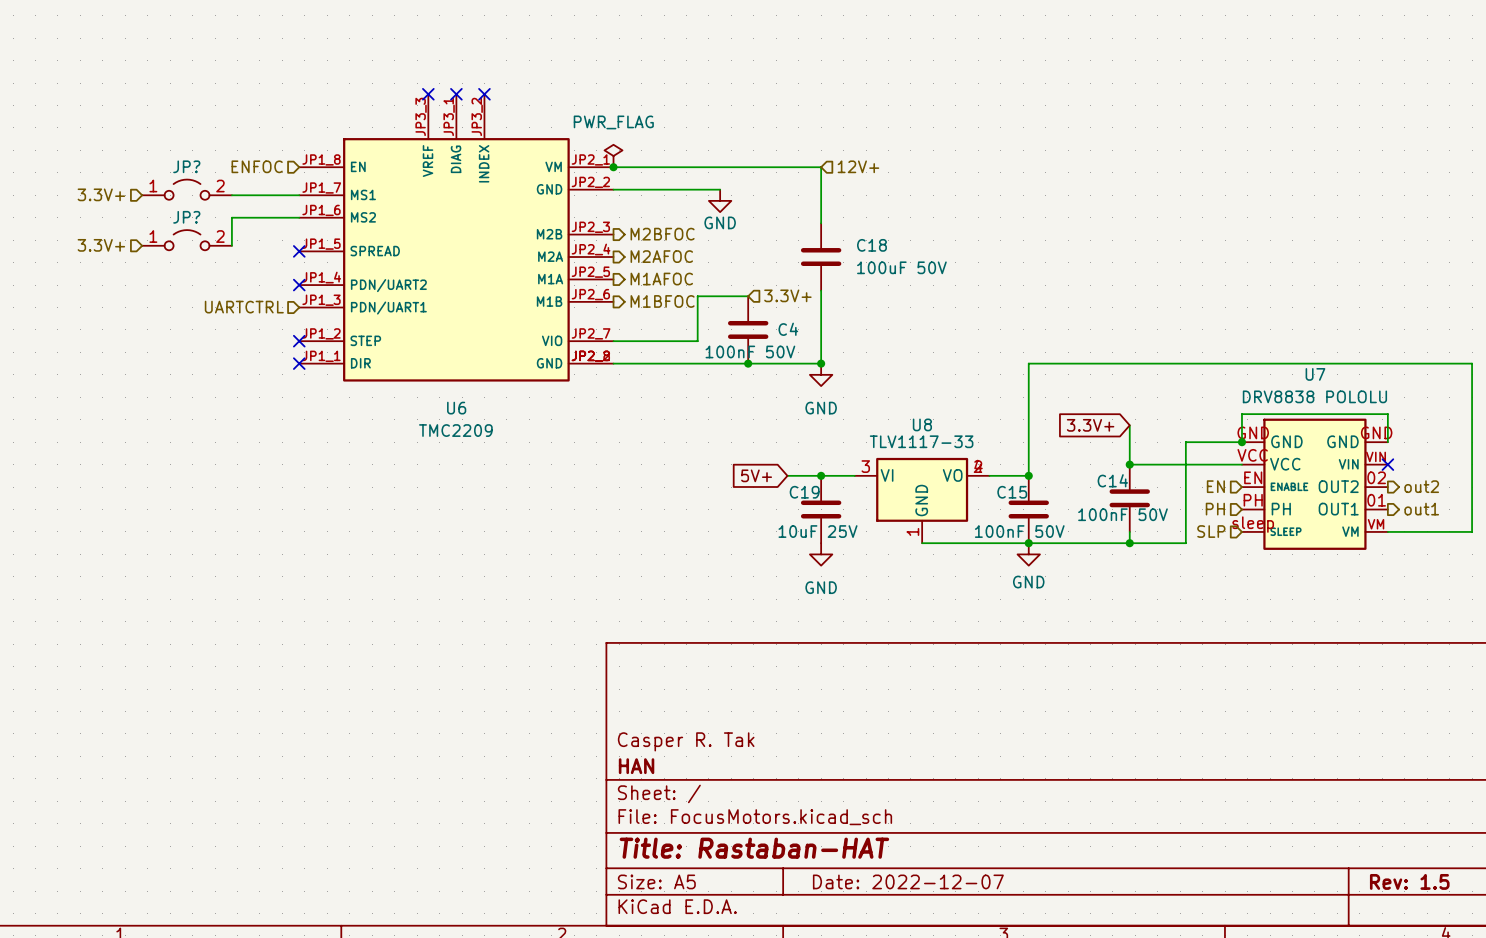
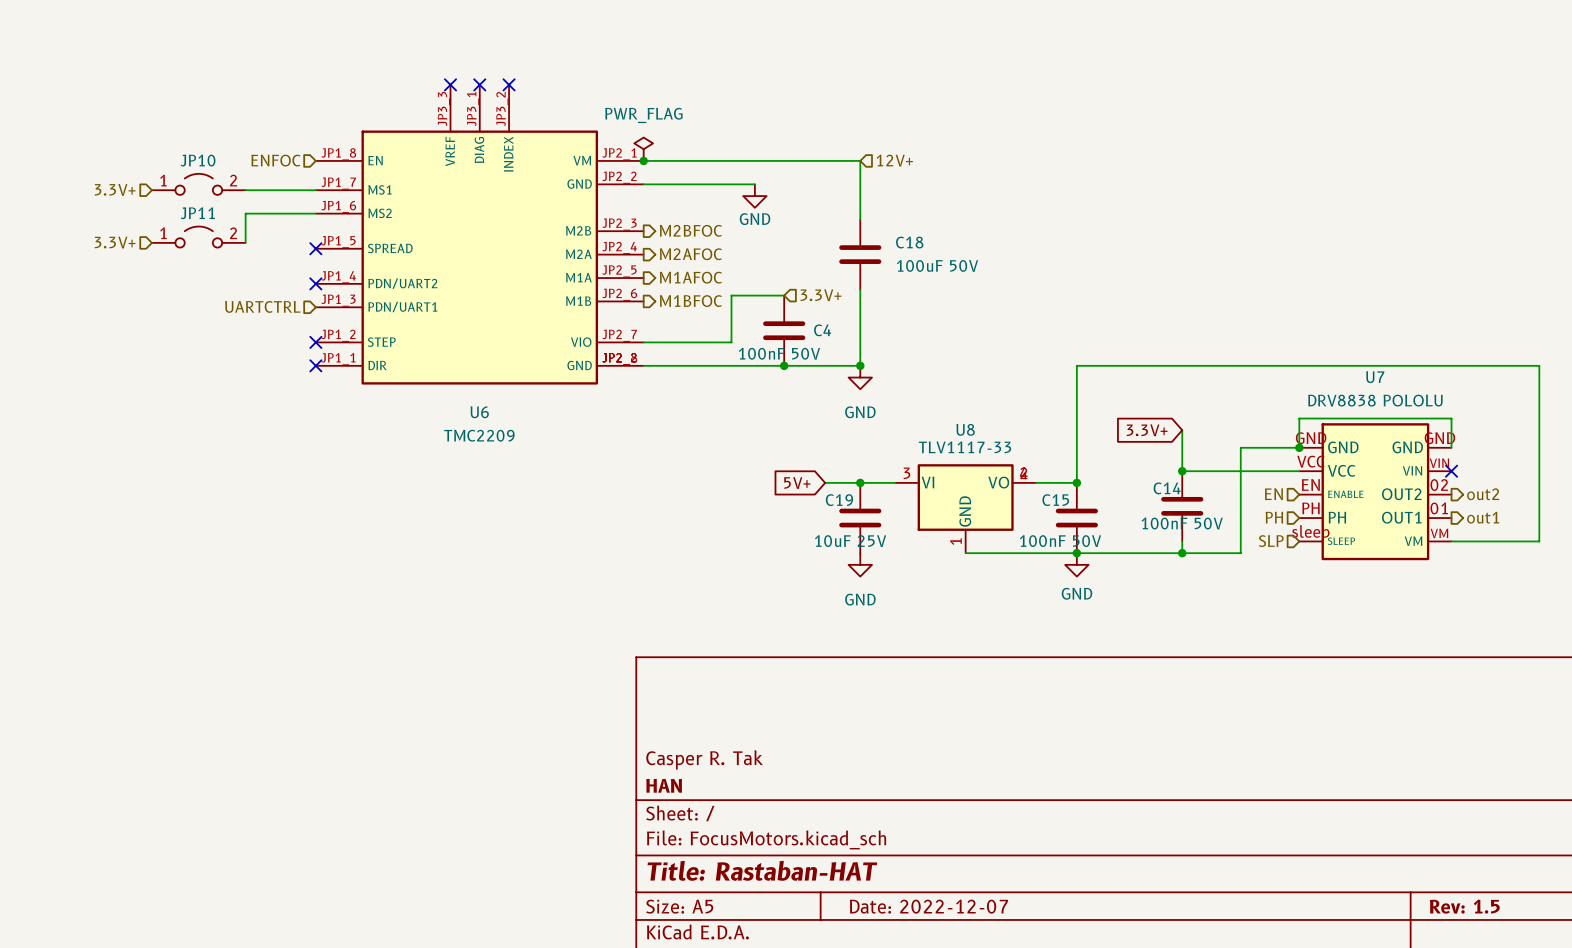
JP? name: JP? (186, 166) -> JP10 (198, 160)
JP? name: JP? (186, 217) -> JP11 (197, 213)

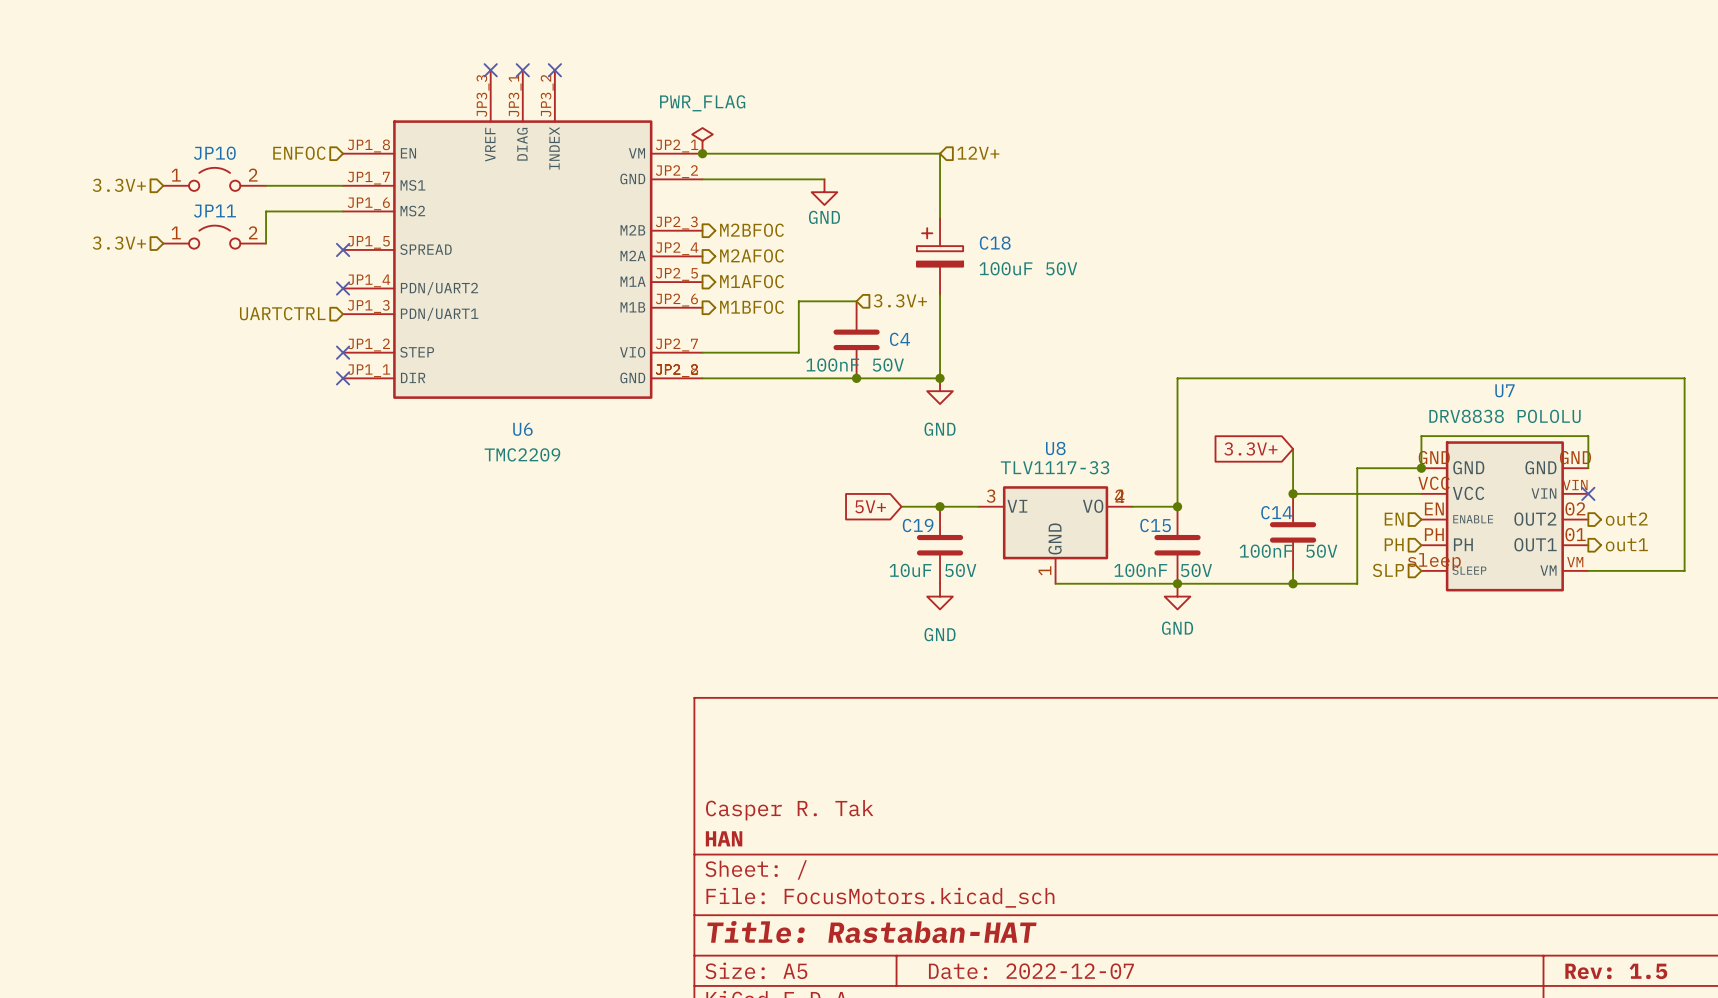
C18 symbol: [839, 219, 882, 290] -> [916, 217, 964, 295]
C19 value: 10uF 25V (850, 541) -> 10uF 50V (932, 570)

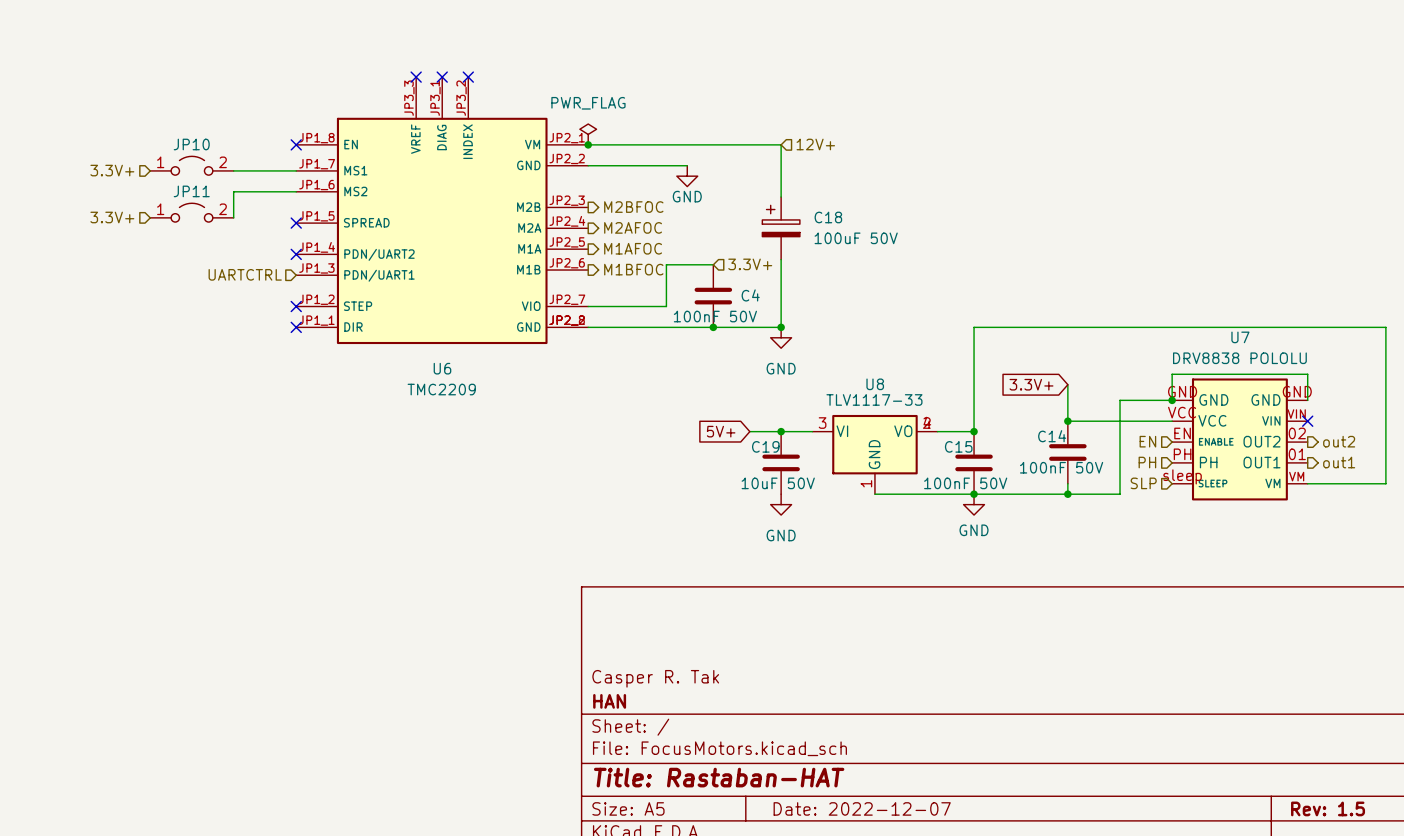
hierarchical label: ENFOC (299, 153) -> none
no-connect mark: none -> (296, 144)

